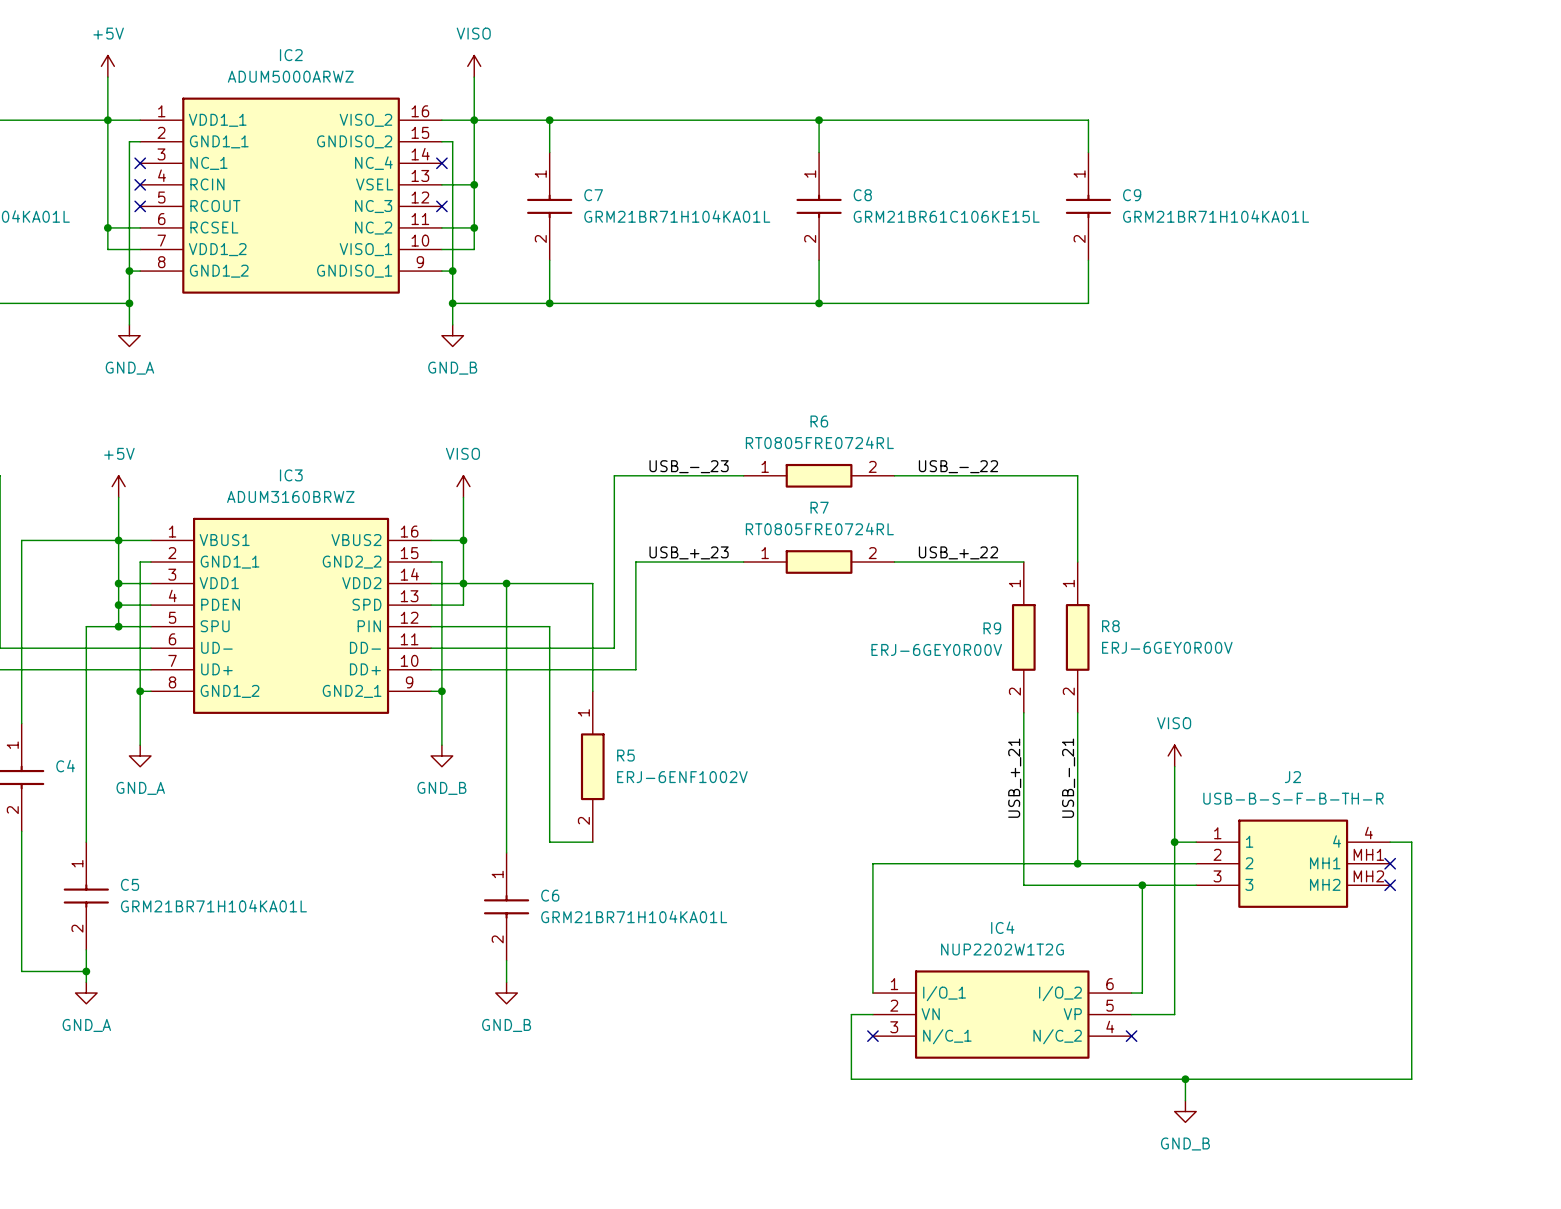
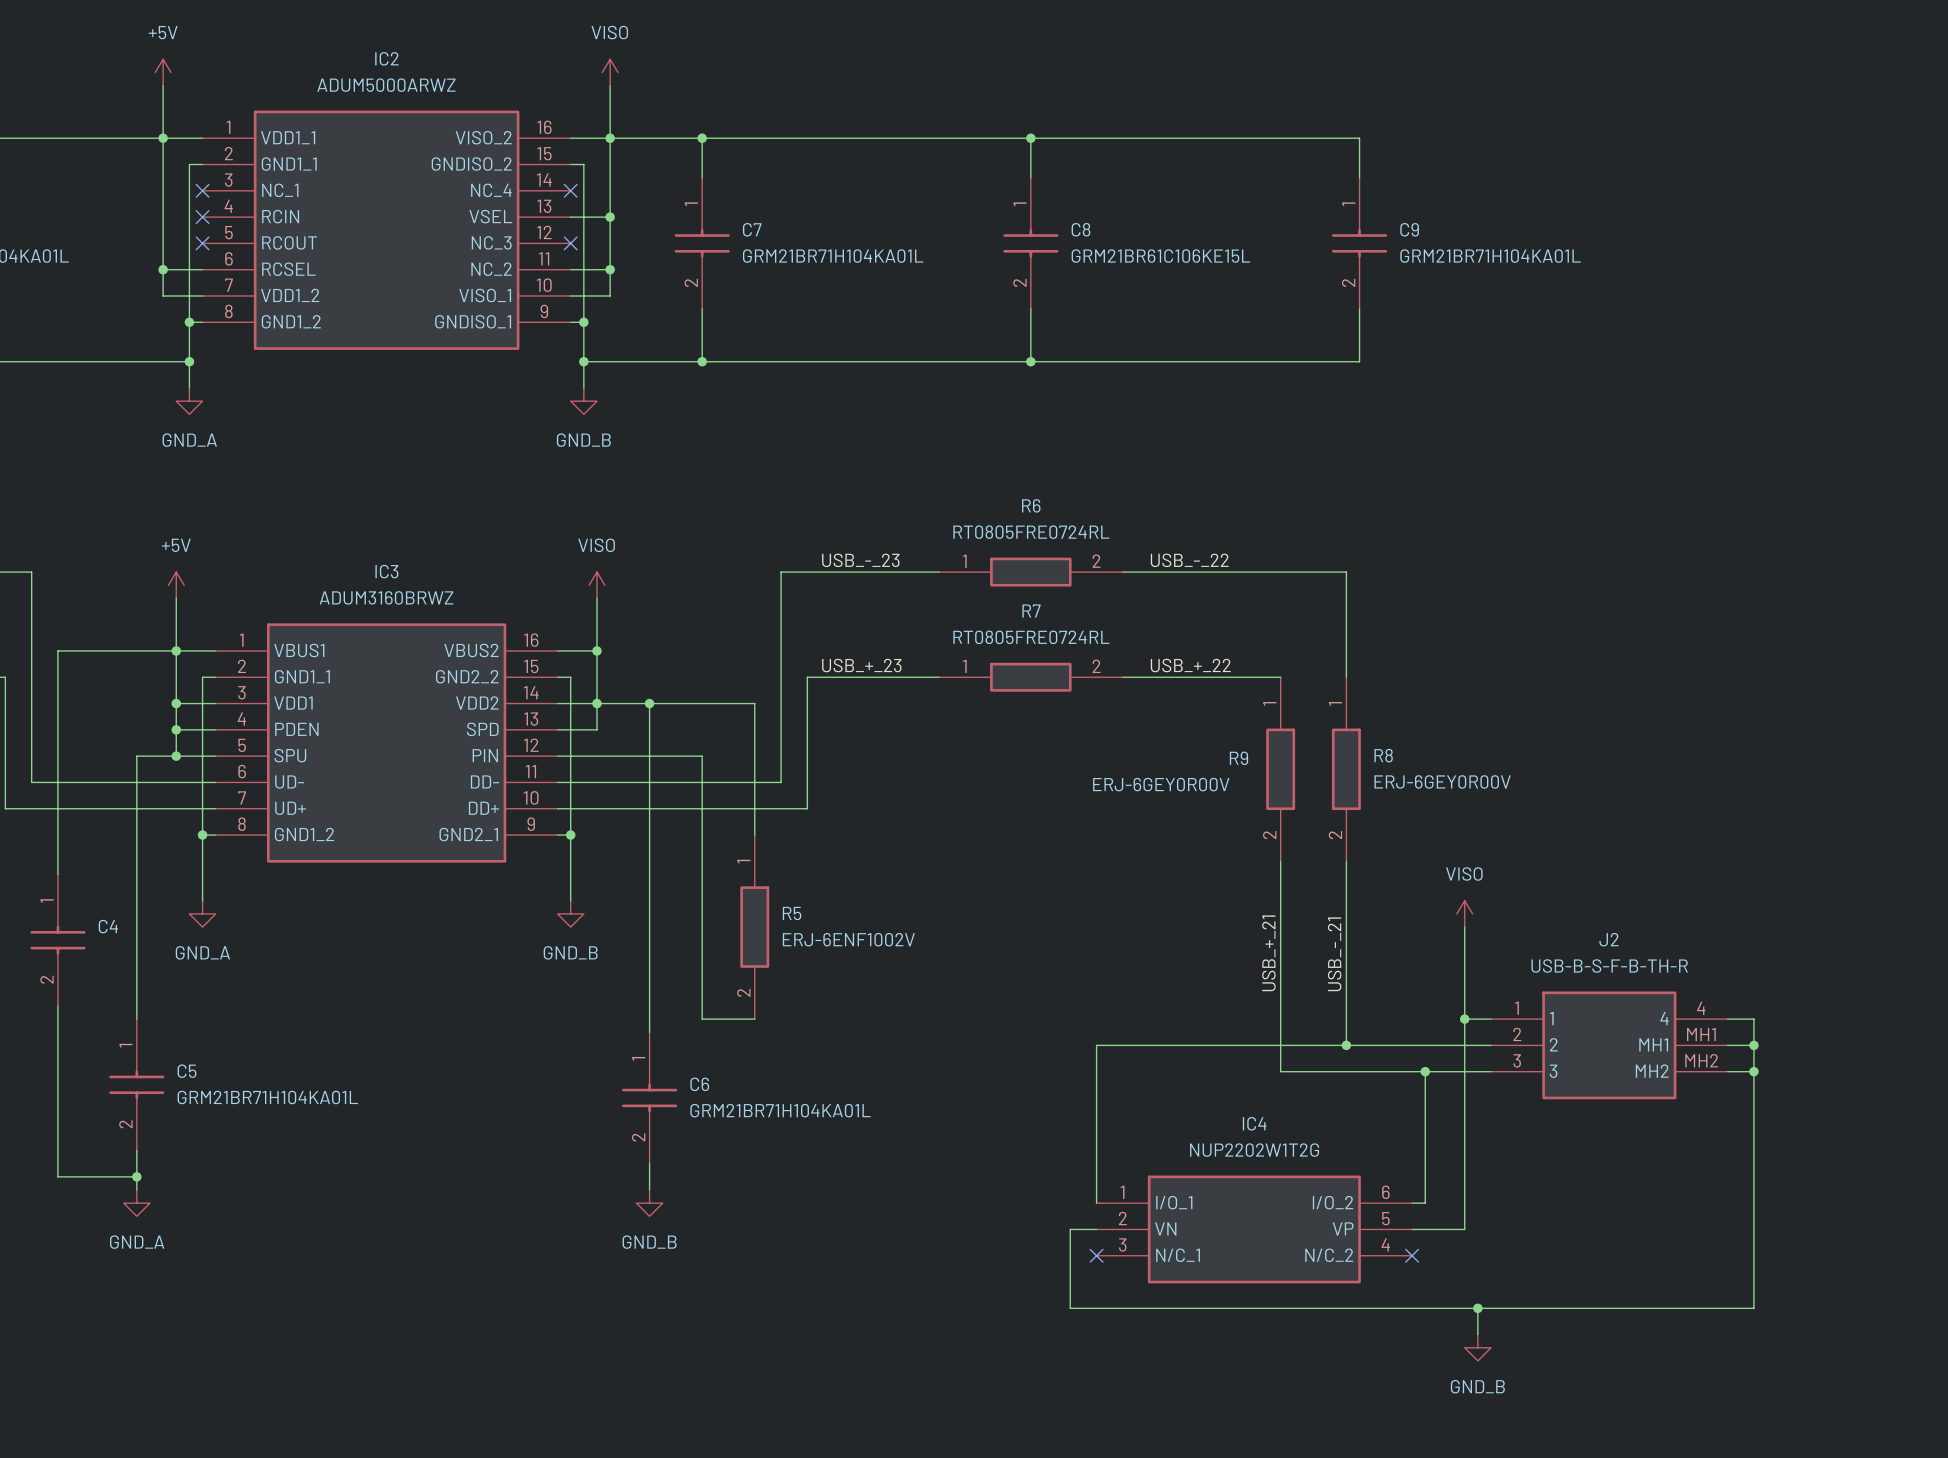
wire: none -> (1727, 1045) (1753, 1045)
no-connect mark: (1390, 863) -> none
junction: none -> (1753, 1045)
wire: none -> (1727, 1071) (1753, 1071)
no-connect mark: (1390, 885) -> none
junction: none -> (1753, 1071)

